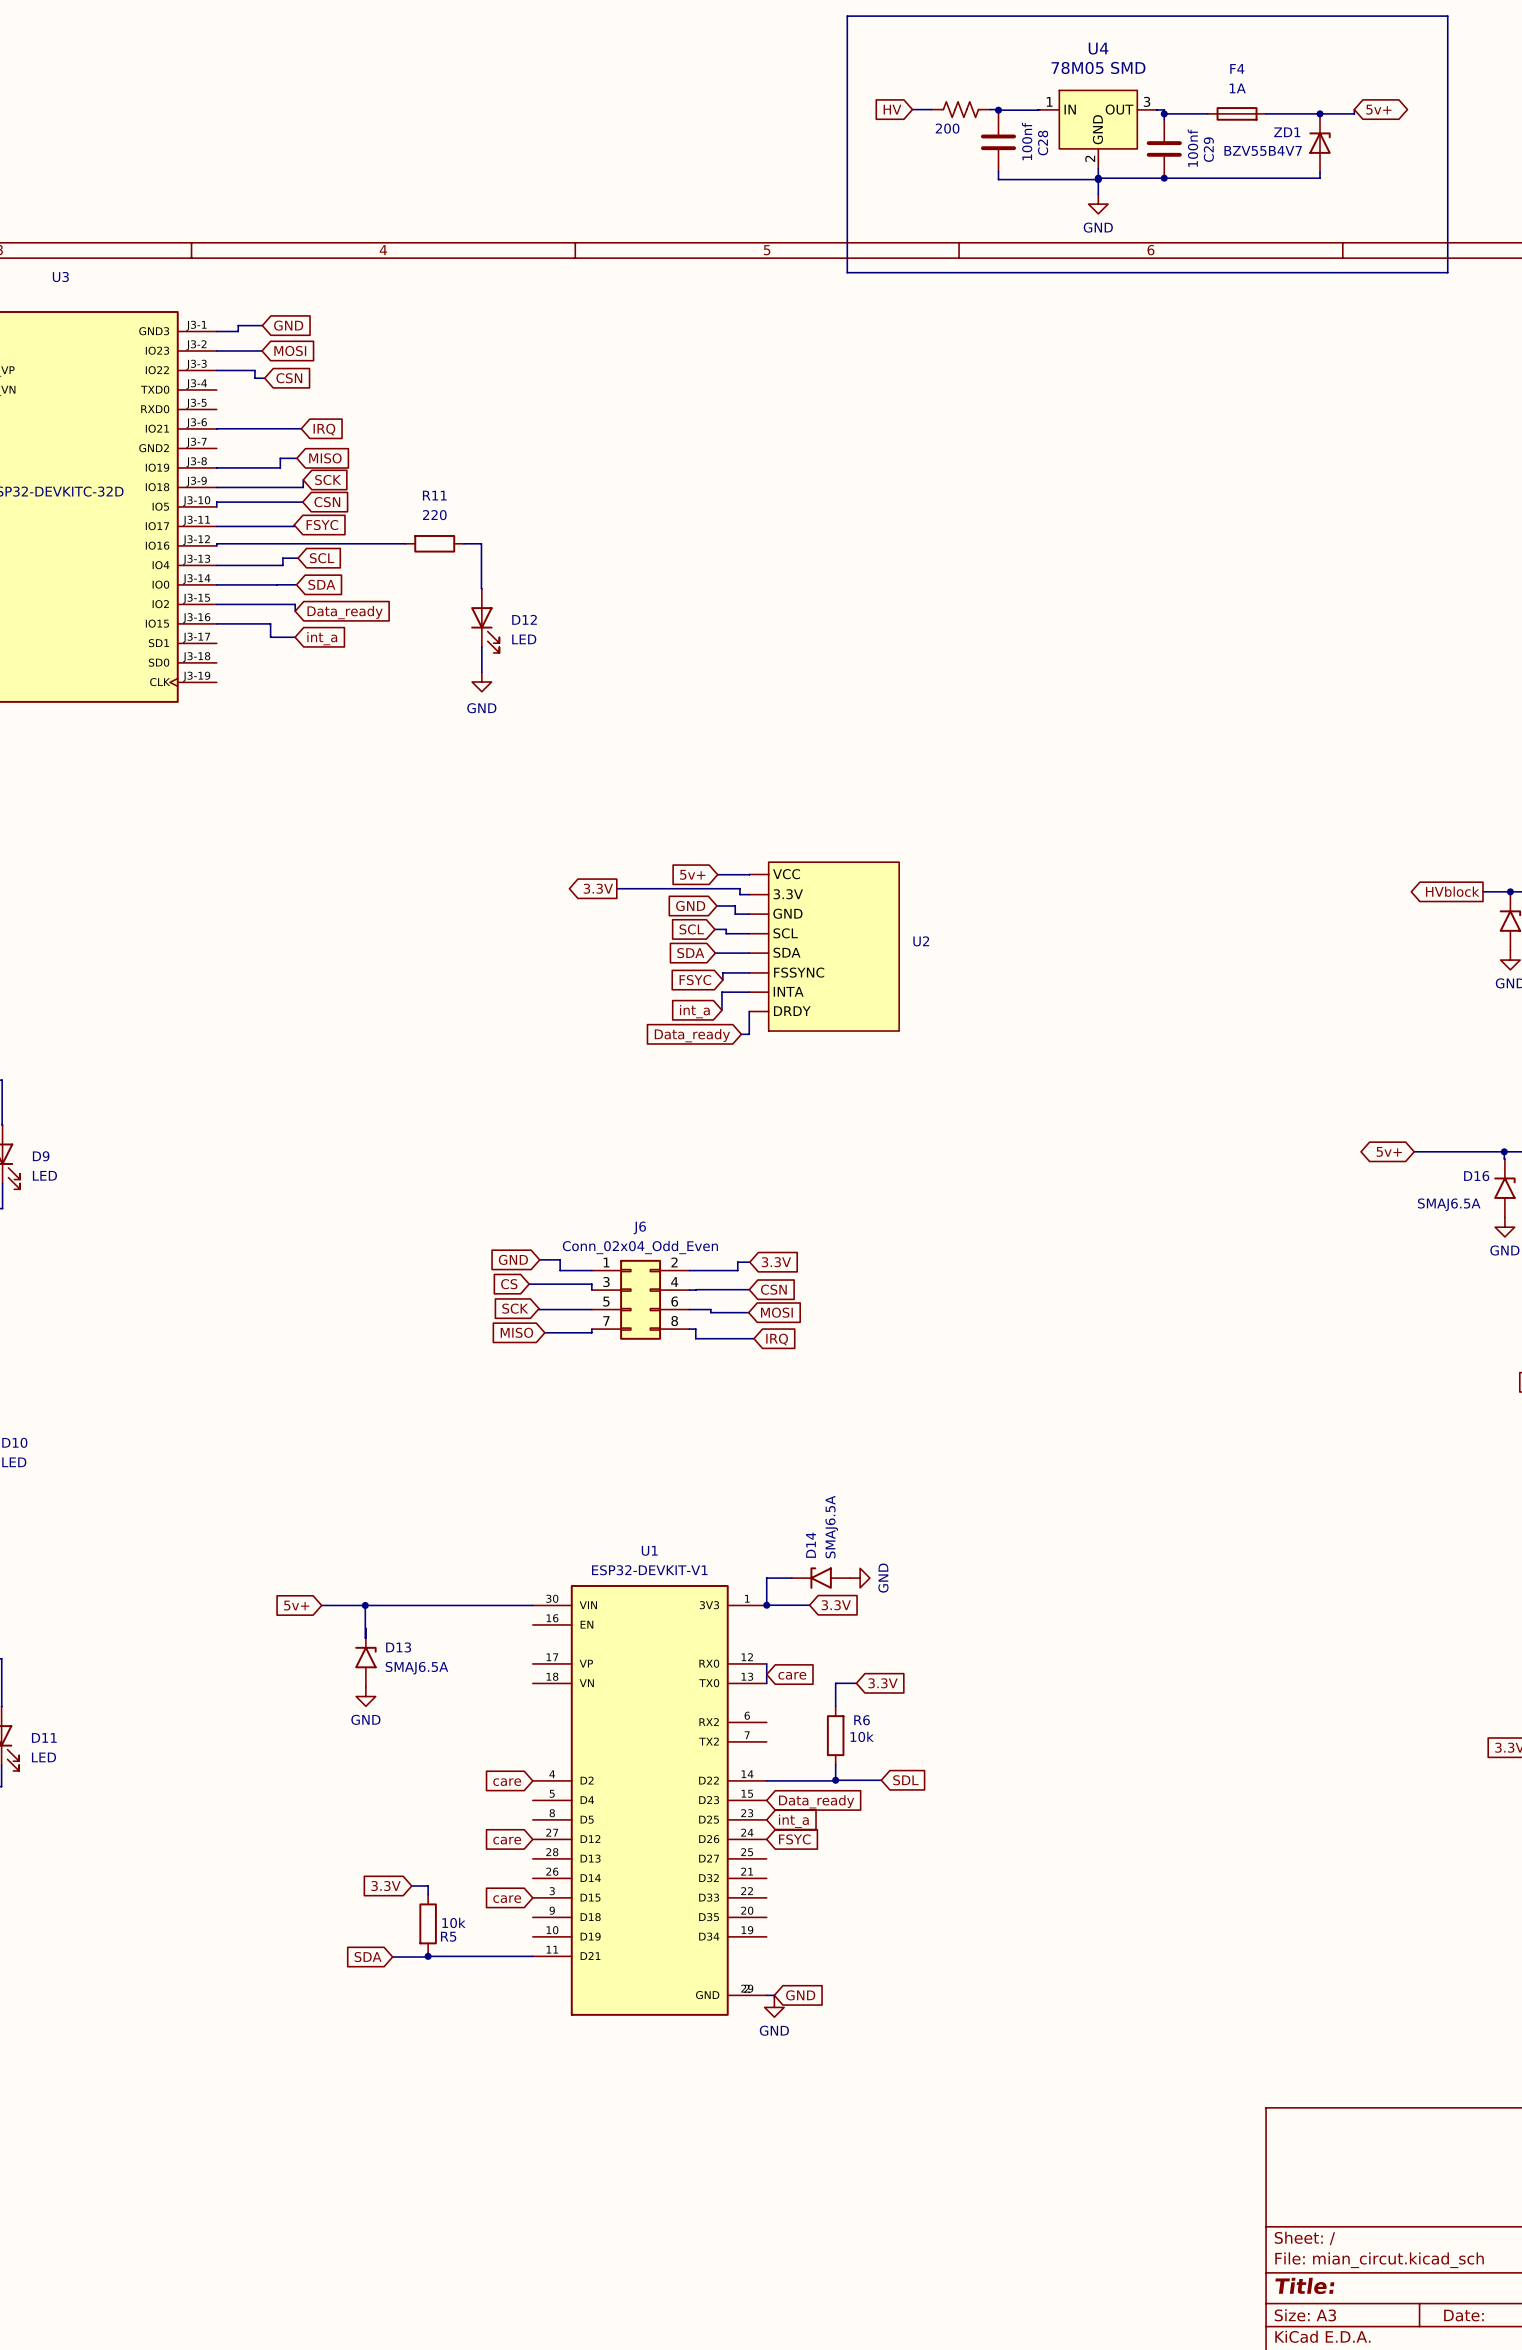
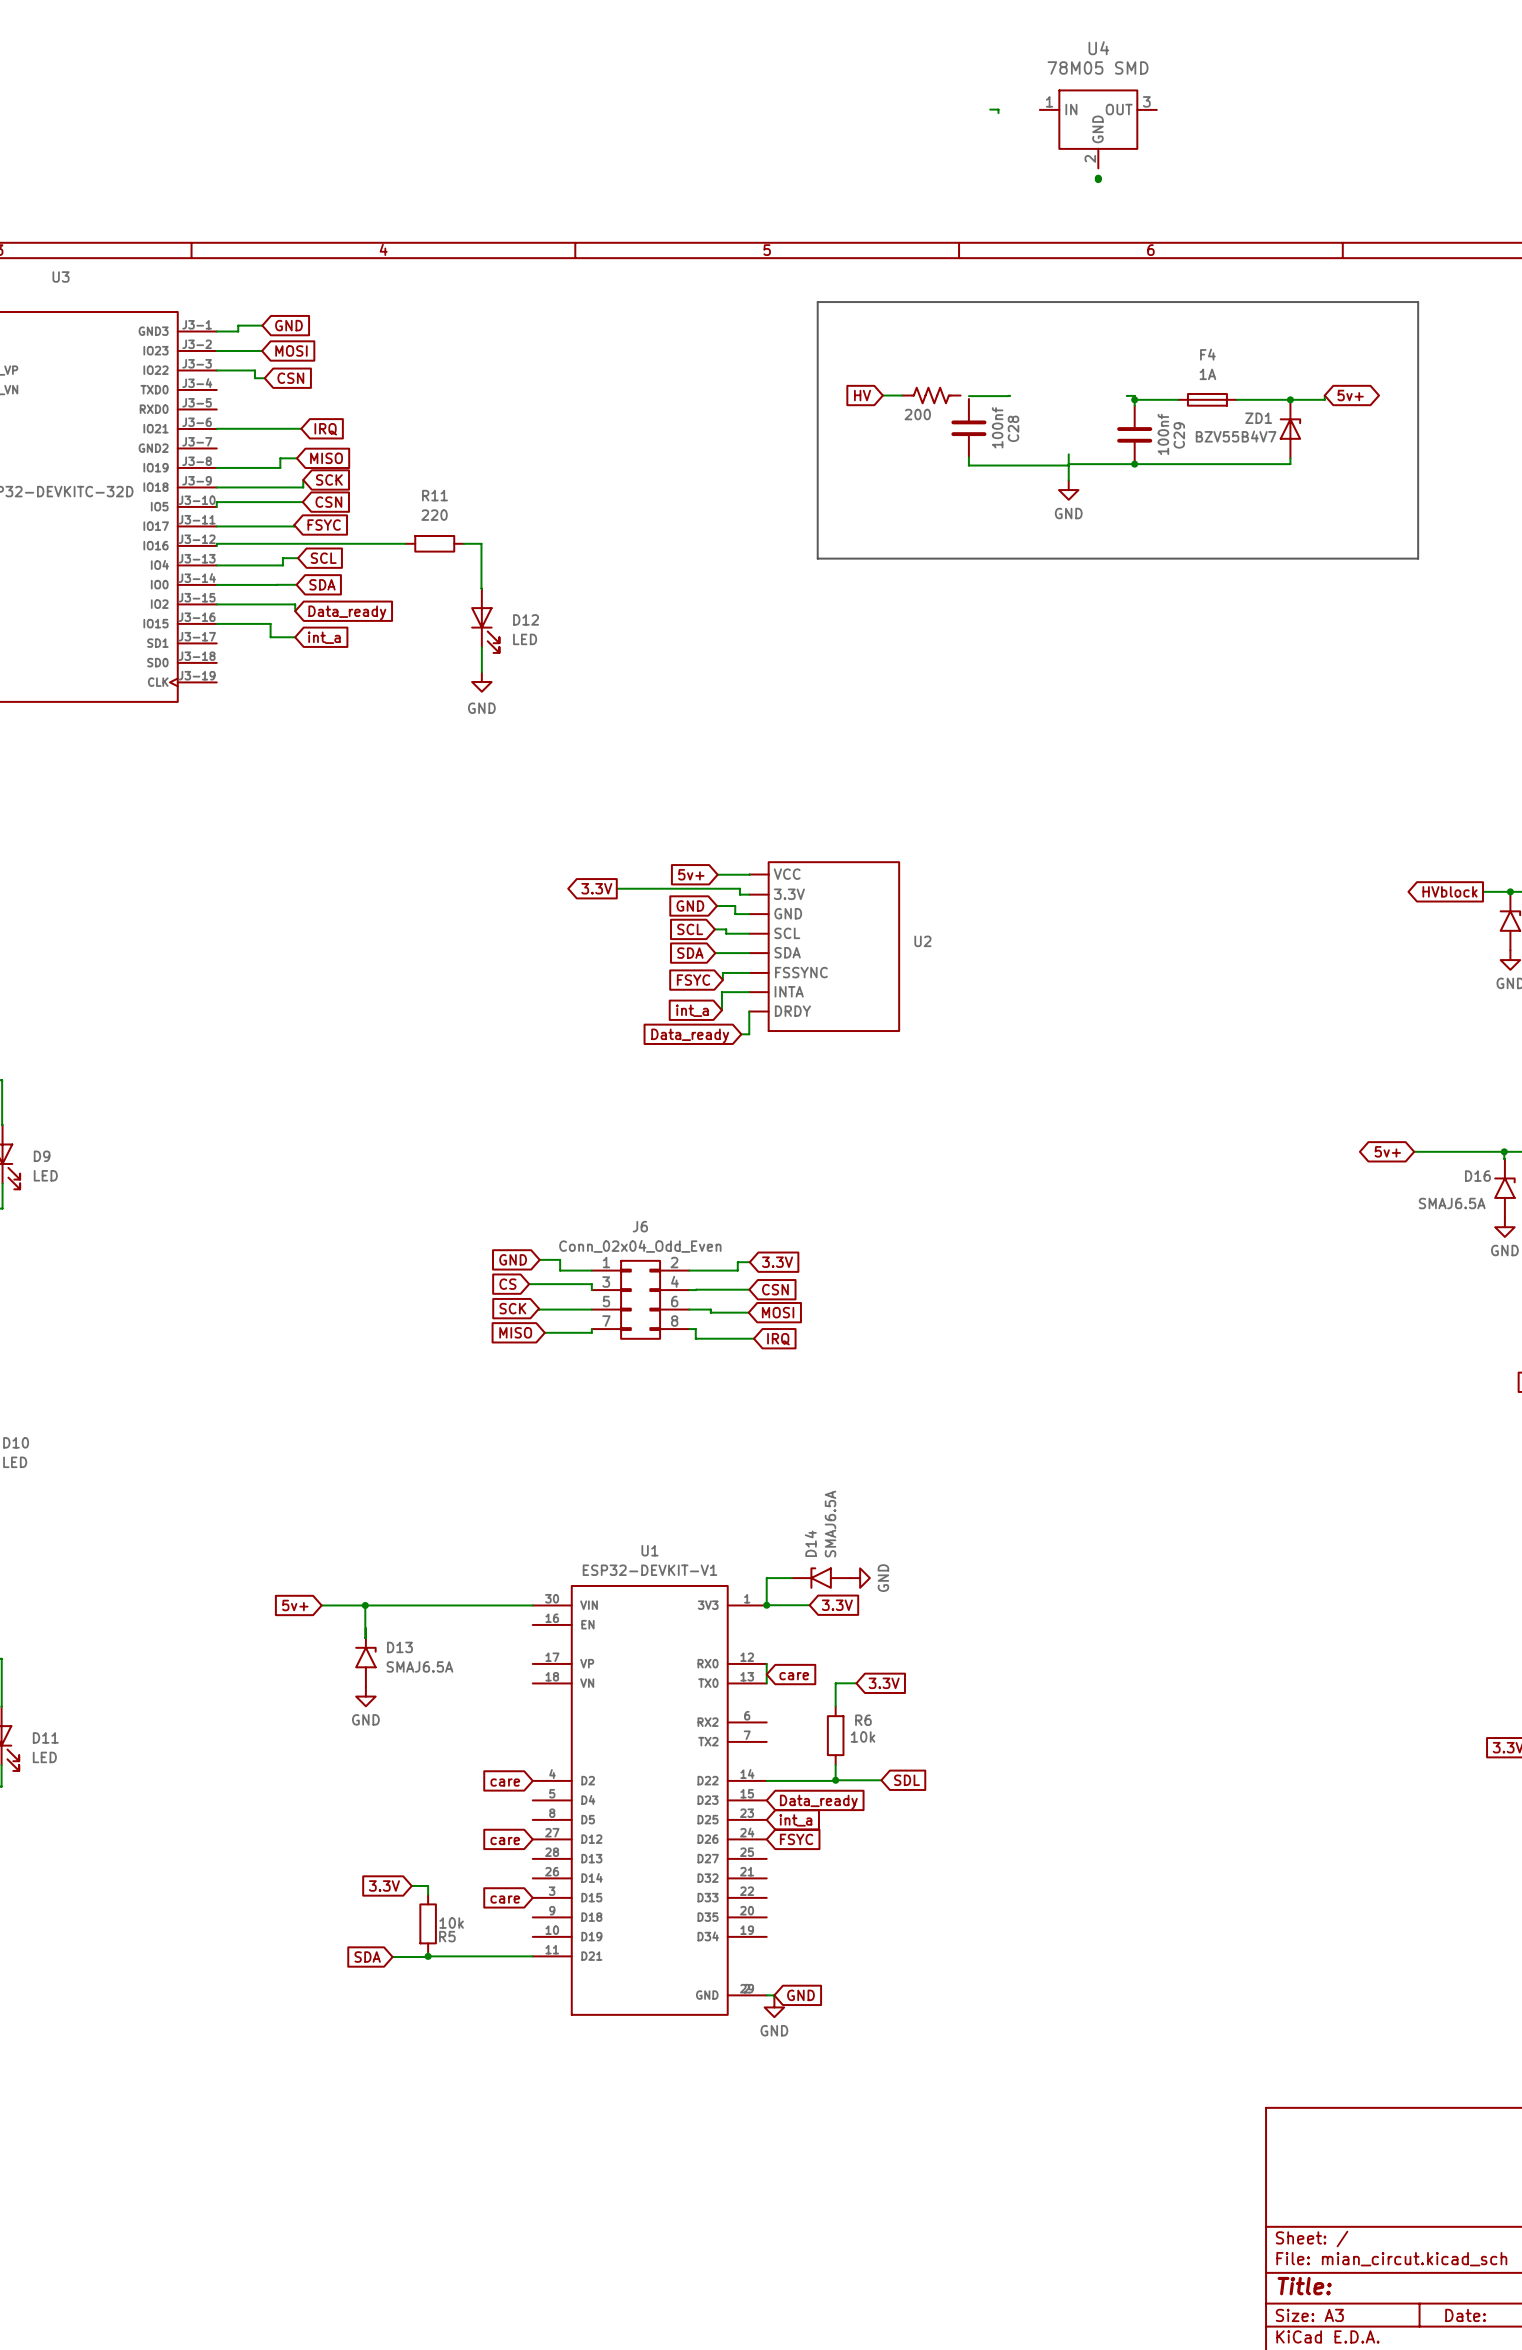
line: (847, 16) (1447, 16) (1447, 272) (847, 272) (847, 16) -> none
global label: HV (892, 109) -> none
wire: (912, 109) (931, 109) -> none
part: 200 (960, 109) -> none
wire: (1039, 109) (998, 110) -> none
wire: (1156, 109) (1164, 109) (1164, 119) -> none
wire: (1354, 109) (1354, 113) (1266, 113) -> none
global label: 5v+ (1378, 109) -> none
junction: (998, 110) -> none
wire: (1164, 113) (1207, 113) -> none
junction: (1164, 113) -> none
F4 position: (1237, 113) -> (1207, 399)
junction: (1320, 113) -> none
C28 position: (998, 142) -> (968, 428)
ZD1 position: (1320, 143) -> (1290, 429)
C29 position: (1164, 148) -> (1134, 434)
wire: (1098, 168) (1098, 194) -> none
wire: (998, 171) (998, 179) (1098, 179) -> none
wire: (1320, 172) (1320, 178) (1098, 178) -> none
junction: (1164, 178) -> none
power symbol: GND (1098, 204) -> none
line: none -> (817, 302) (1418, 302) (1418, 558) (817, 558) (817, 302)
global label: none -> HV (862, 395)
wire: none -> (882, 395) (902, 395)
part: none -> 200 (931, 395)
wire: none -> (1010, 395) (968, 396)
wire: none -> (1127, 395) (1134, 395) (1134, 405)
wire: none -> (1324, 395) (1324, 399) (1236, 399)
global label: none -> 5v+ (1350, 395)
wire: none -> (1134, 399) (1178, 399)
junction: none -> (1134, 399)
junction: none -> (1290, 399)
wire: none -> (1068, 454) (1068, 480)
wire: none -> (968, 457) (968, 465) (1068, 465)
wire: none -> (1290, 458) (1290, 464) (1068, 464)
junction: none -> (1134, 464)
power symbol: none -> GND (1068, 490)

